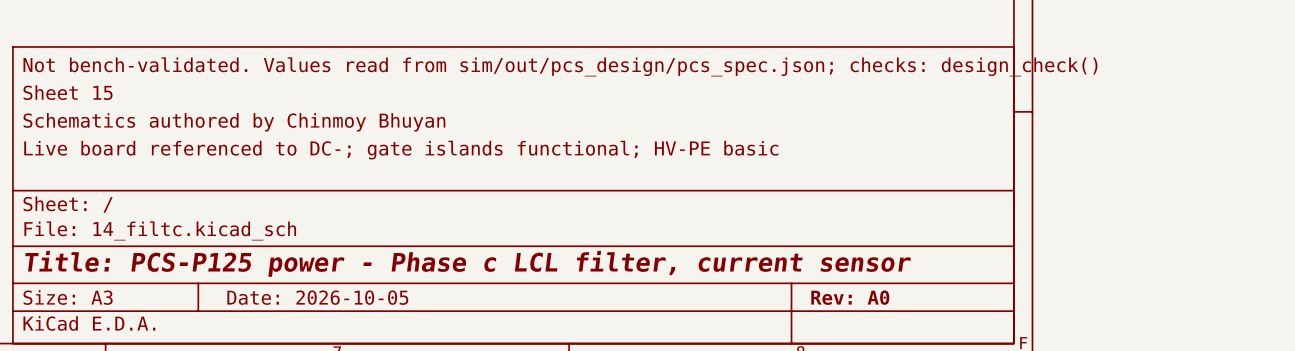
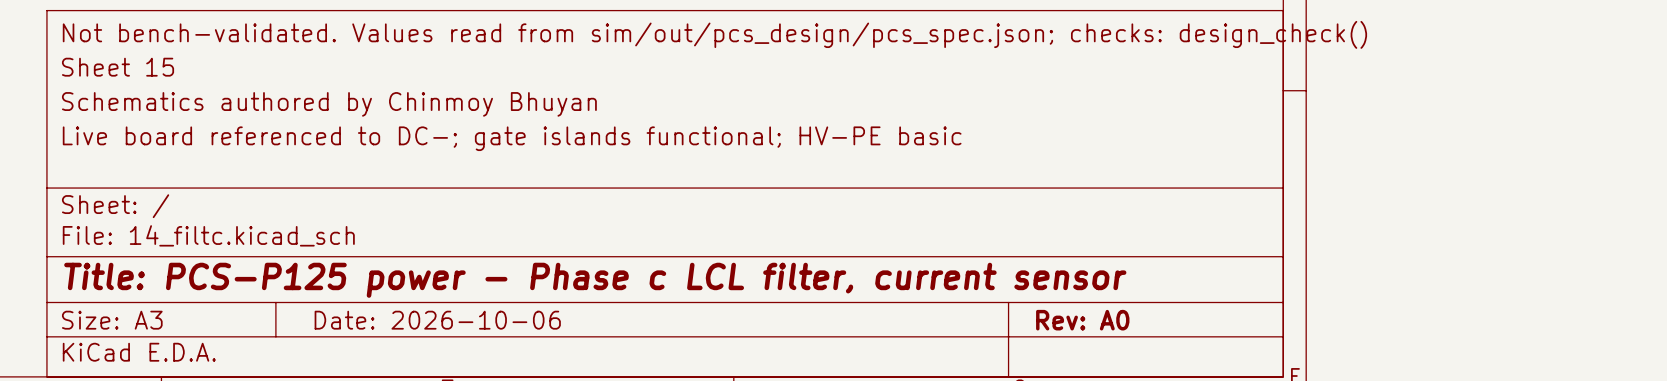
title block: Date: 2026-10-05 (317, 297) -> Date: 2026-10-06 (437, 320)

